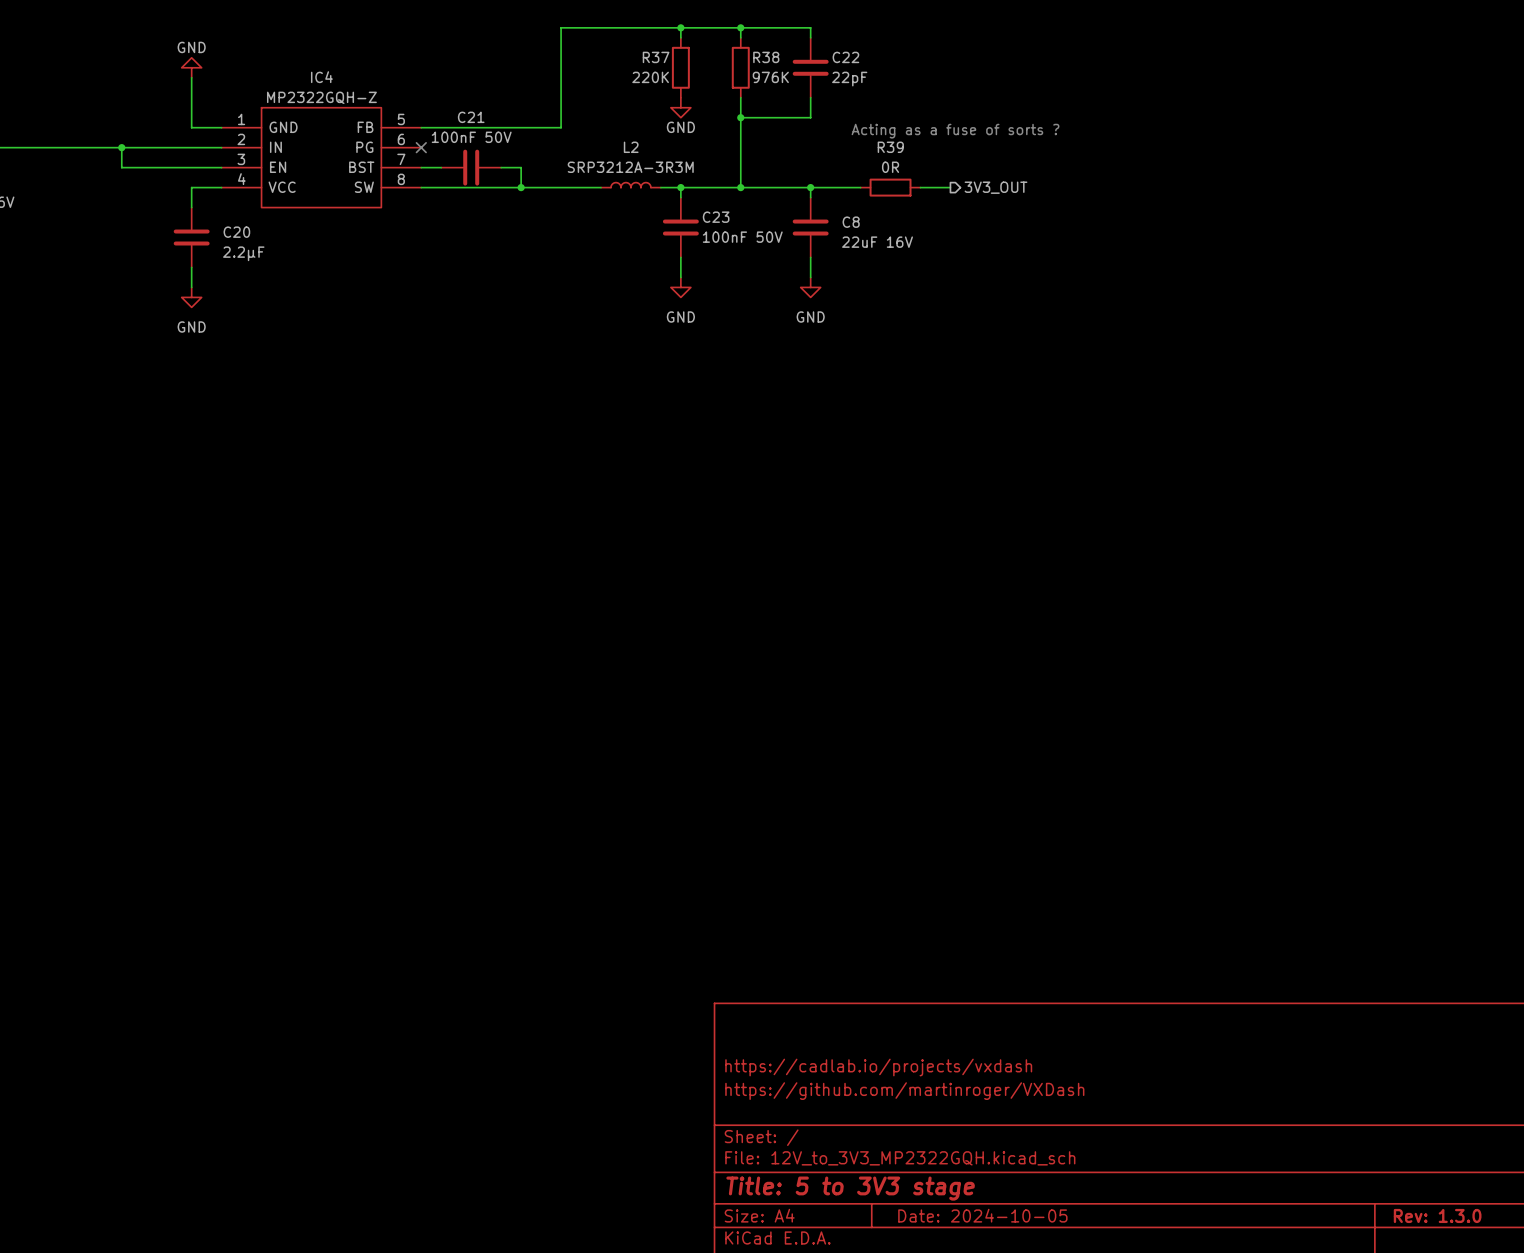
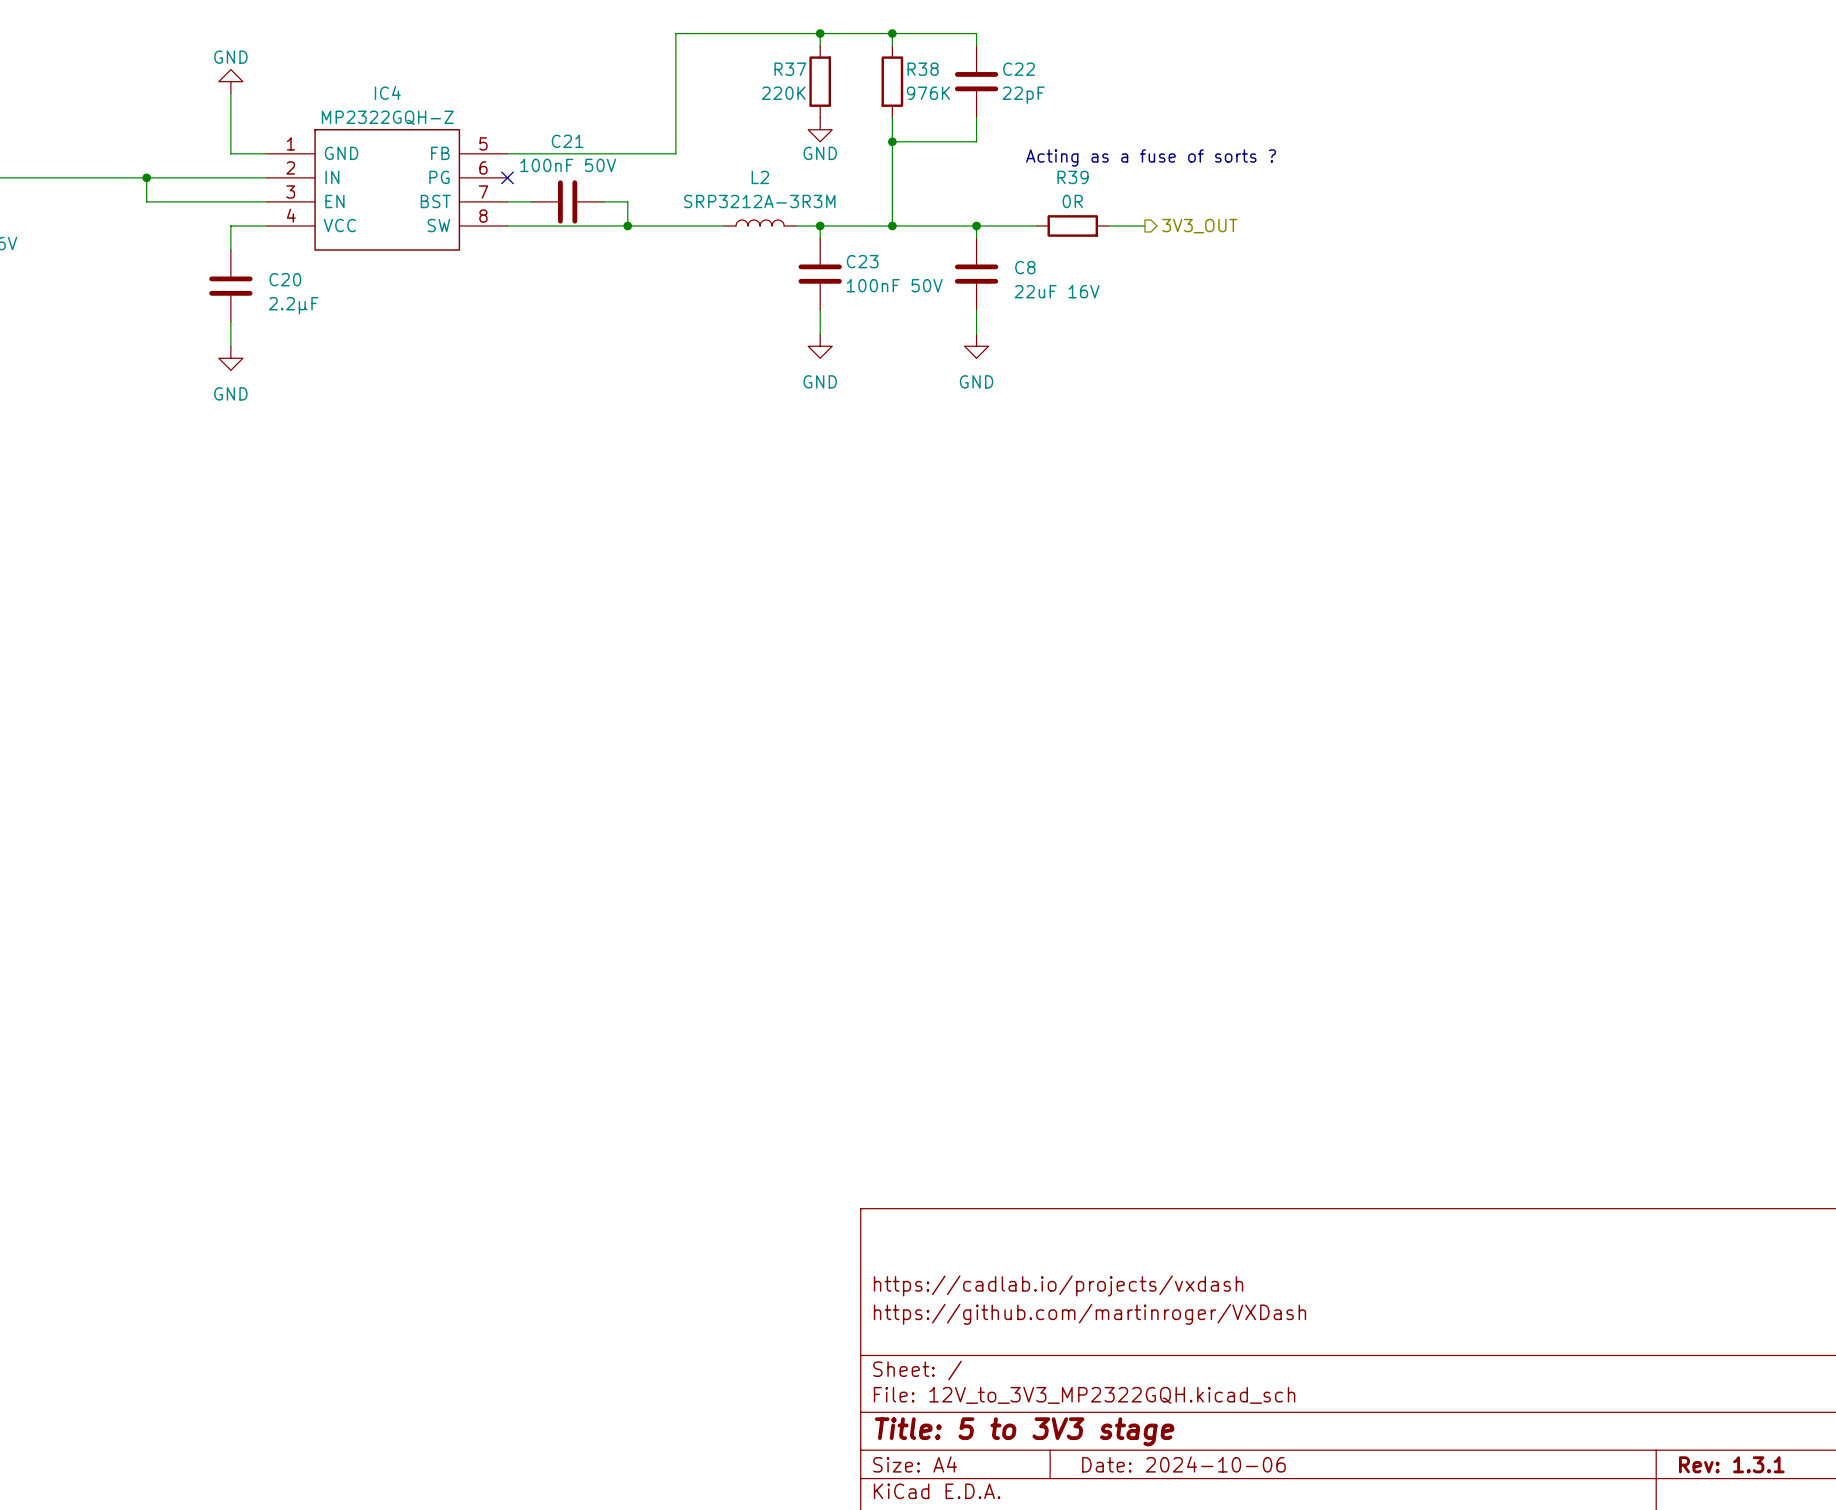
title block: Date: 2024-10-05 (982, 1215) -> Date: 2024-10-06 (1184, 1464)
title block: Rev: 1.3.0 (1437, 1215) -> Rev: 1.3.1 (1731, 1464)

